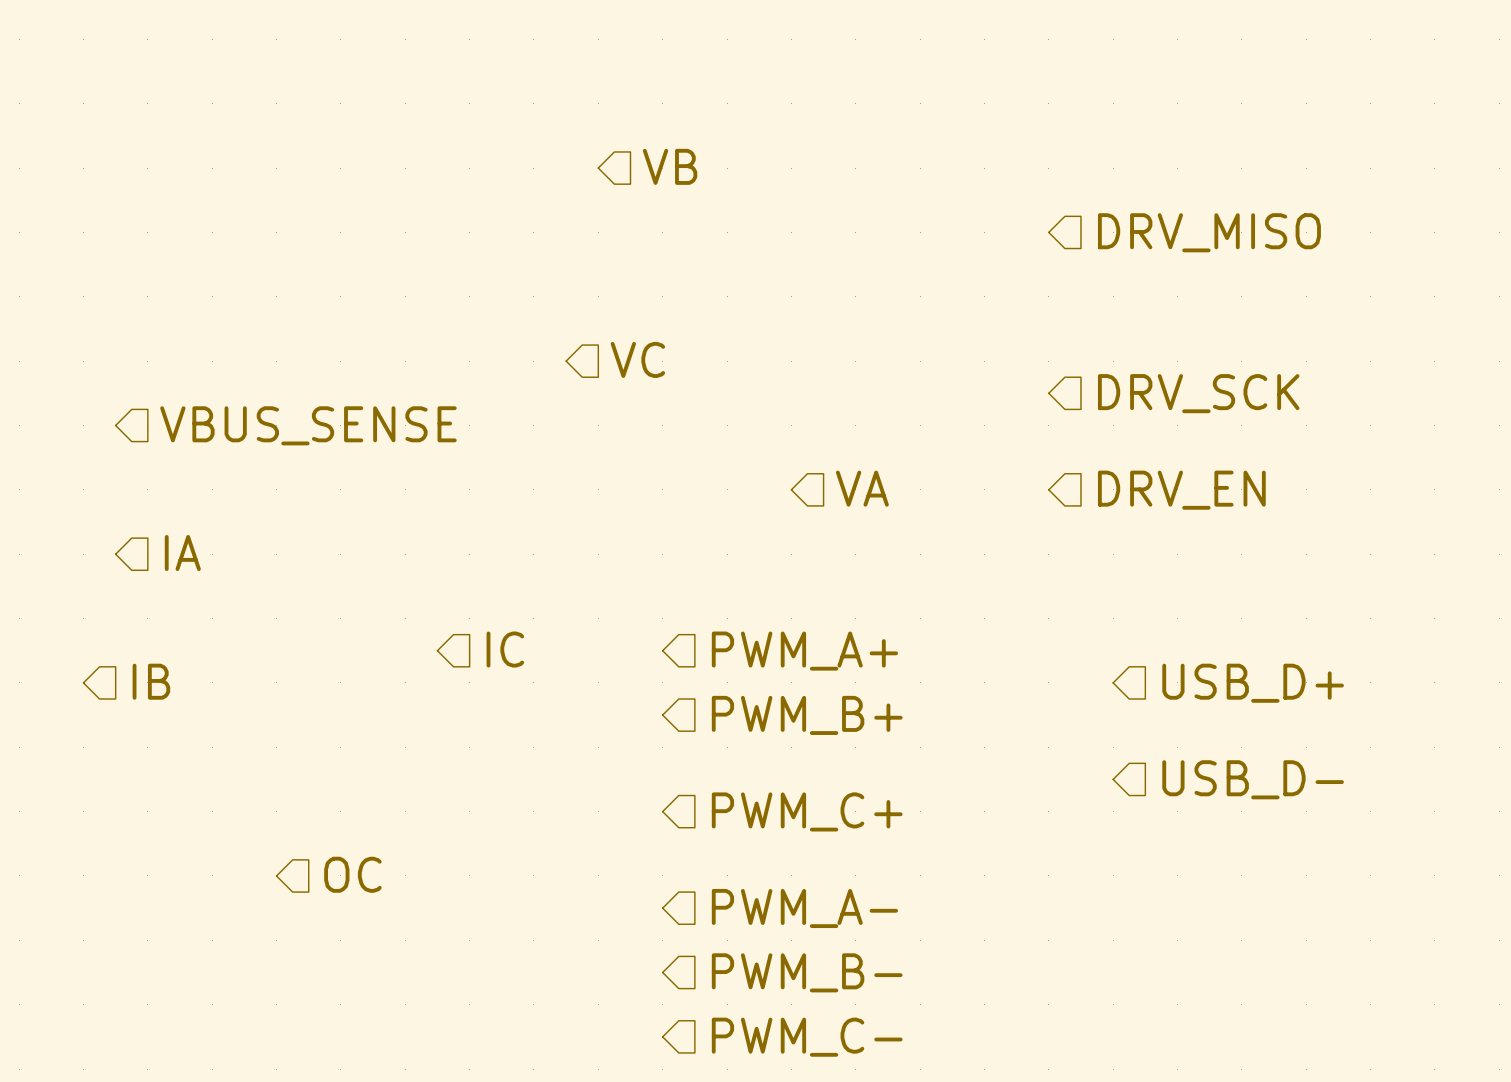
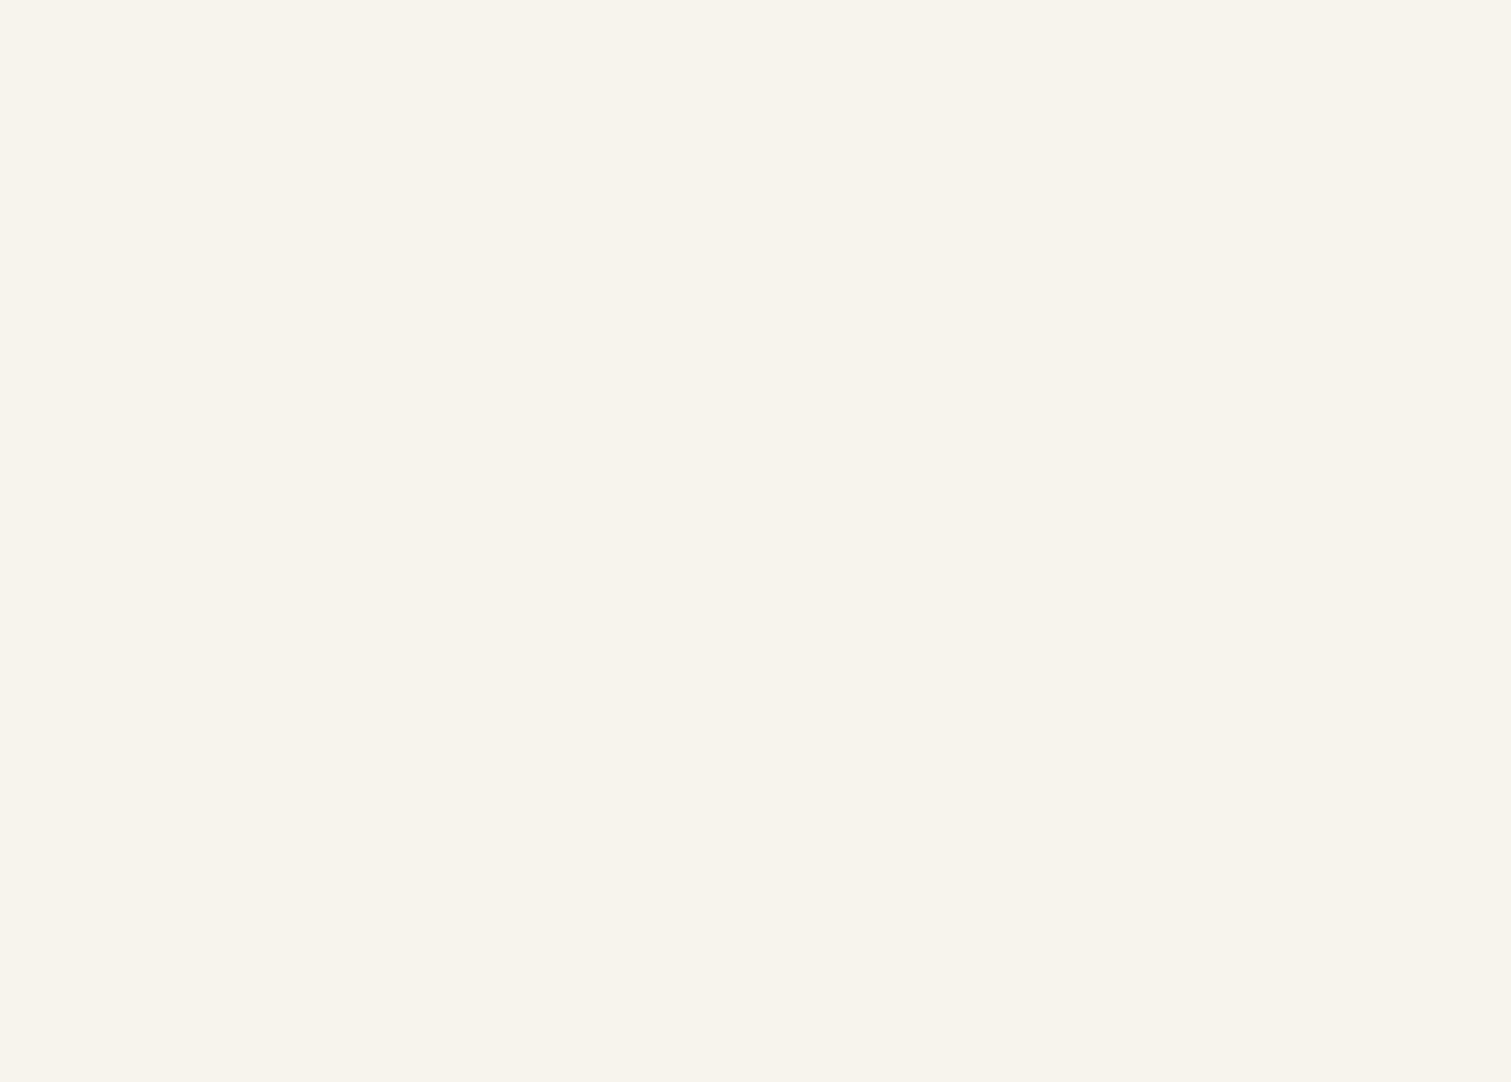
hierarchical label: VB (670, 166) -> none
hierarchical label: DRV_MISO (1209, 232) -> none
hierarchical label: VC (637, 359) -> none
hierarchical label: DRV_SCK (1198, 393) -> none
hierarchical label: VBUS_SENSE (308, 425) -> none
hierarchical label: VA (862, 488) -> none
hierarchical label: DRV_EN (1181, 490) -> none
hierarchical label: IA (182, 553) -> none
hierarchical label: IC (505, 649) -> none
hierarchical label: PWM_A+ (804, 651) -> none
hierarchical label: IB (151, 681) -> none
hierarchical label: USB_D+ (1253, 683) -> none
hierarchical label: PWM_B+ (807, 715) -> none
hierarchical label: USB_D- (1253, 779) -> none
hierarchical label: PWM_C+ (807, 811) -> none
hierarchical label: OC (352, 874) -> none
hierarchical label: PWM_A- (804, 908) -> none
hierarchical label: PWM_B- (807, 972) -> none
hierarchical label: PWM_C- (807, 1037) -> none

